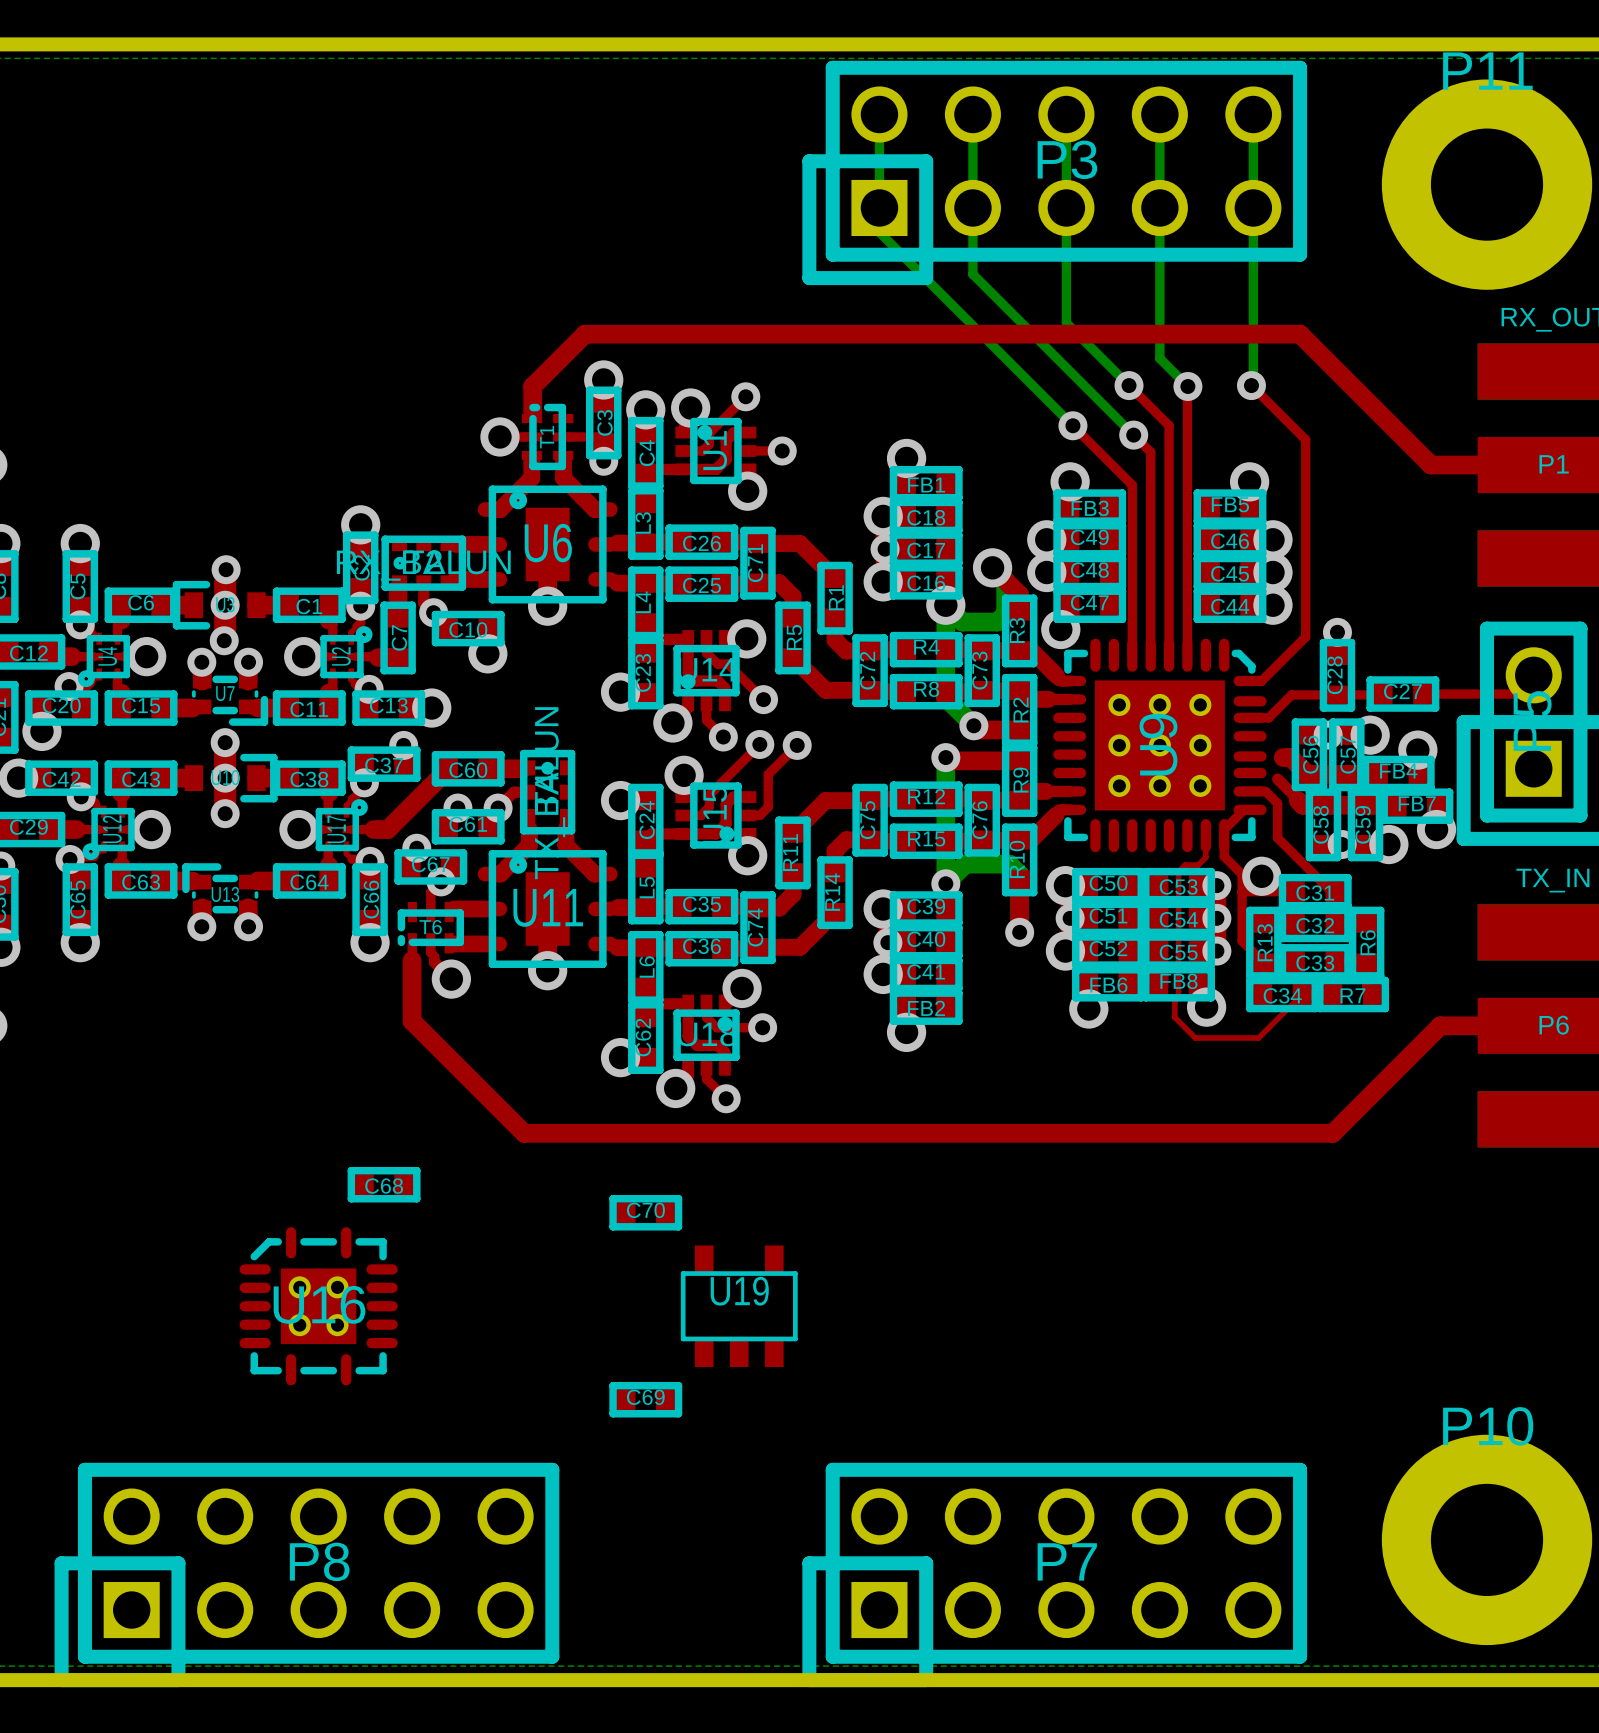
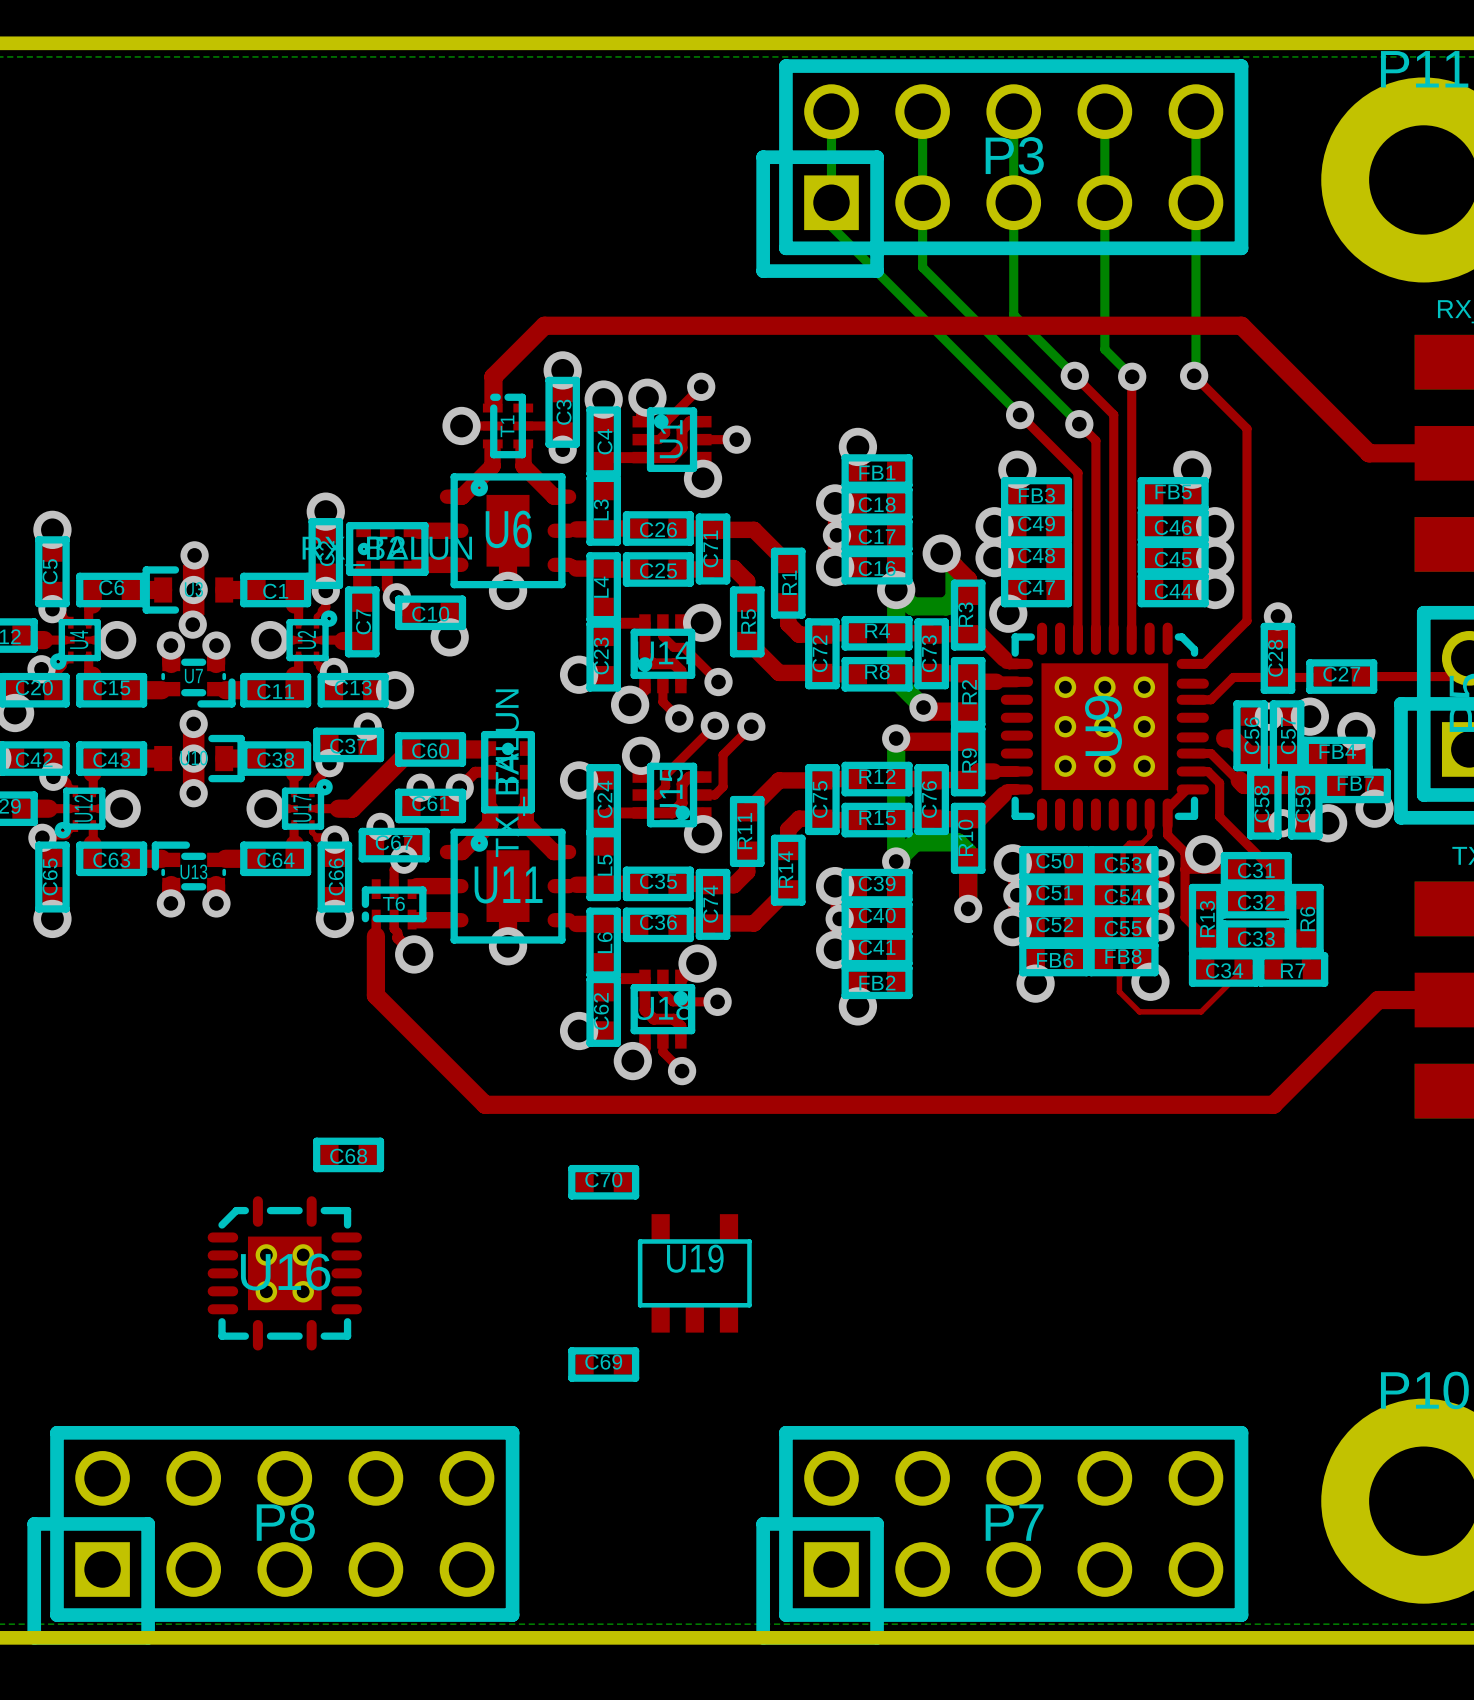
top track: (1277, 779) (1298, 799) -> (1192, 753) (1211, 753) (1239, 780)

